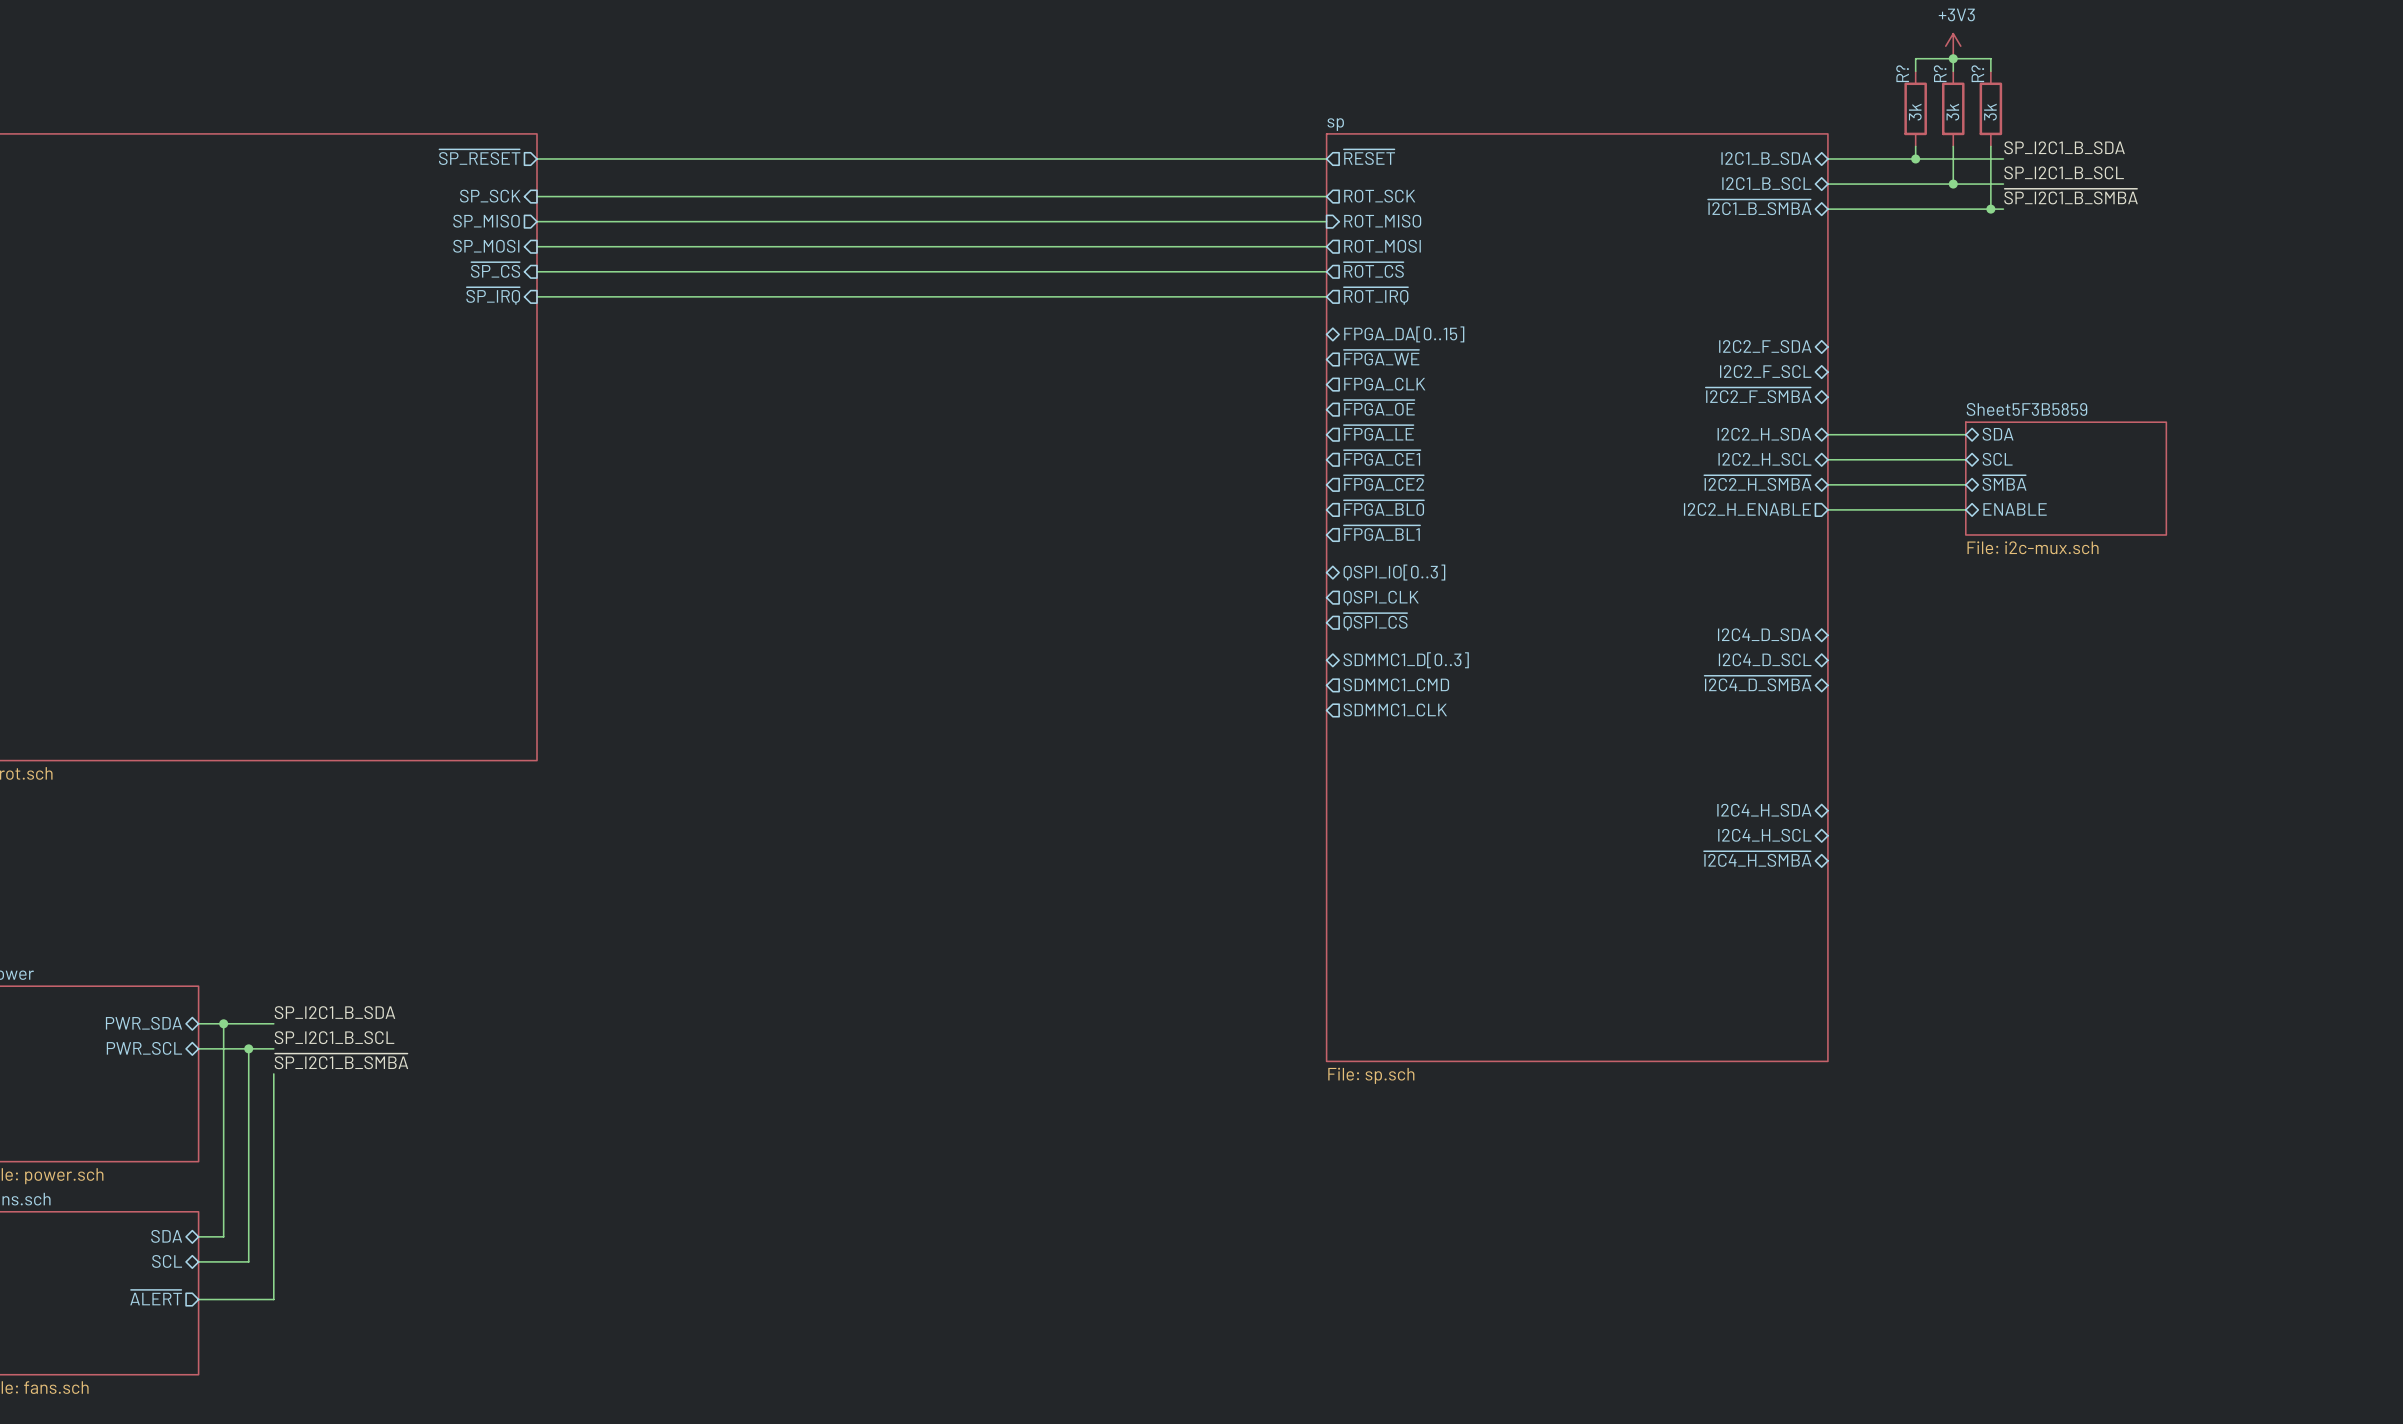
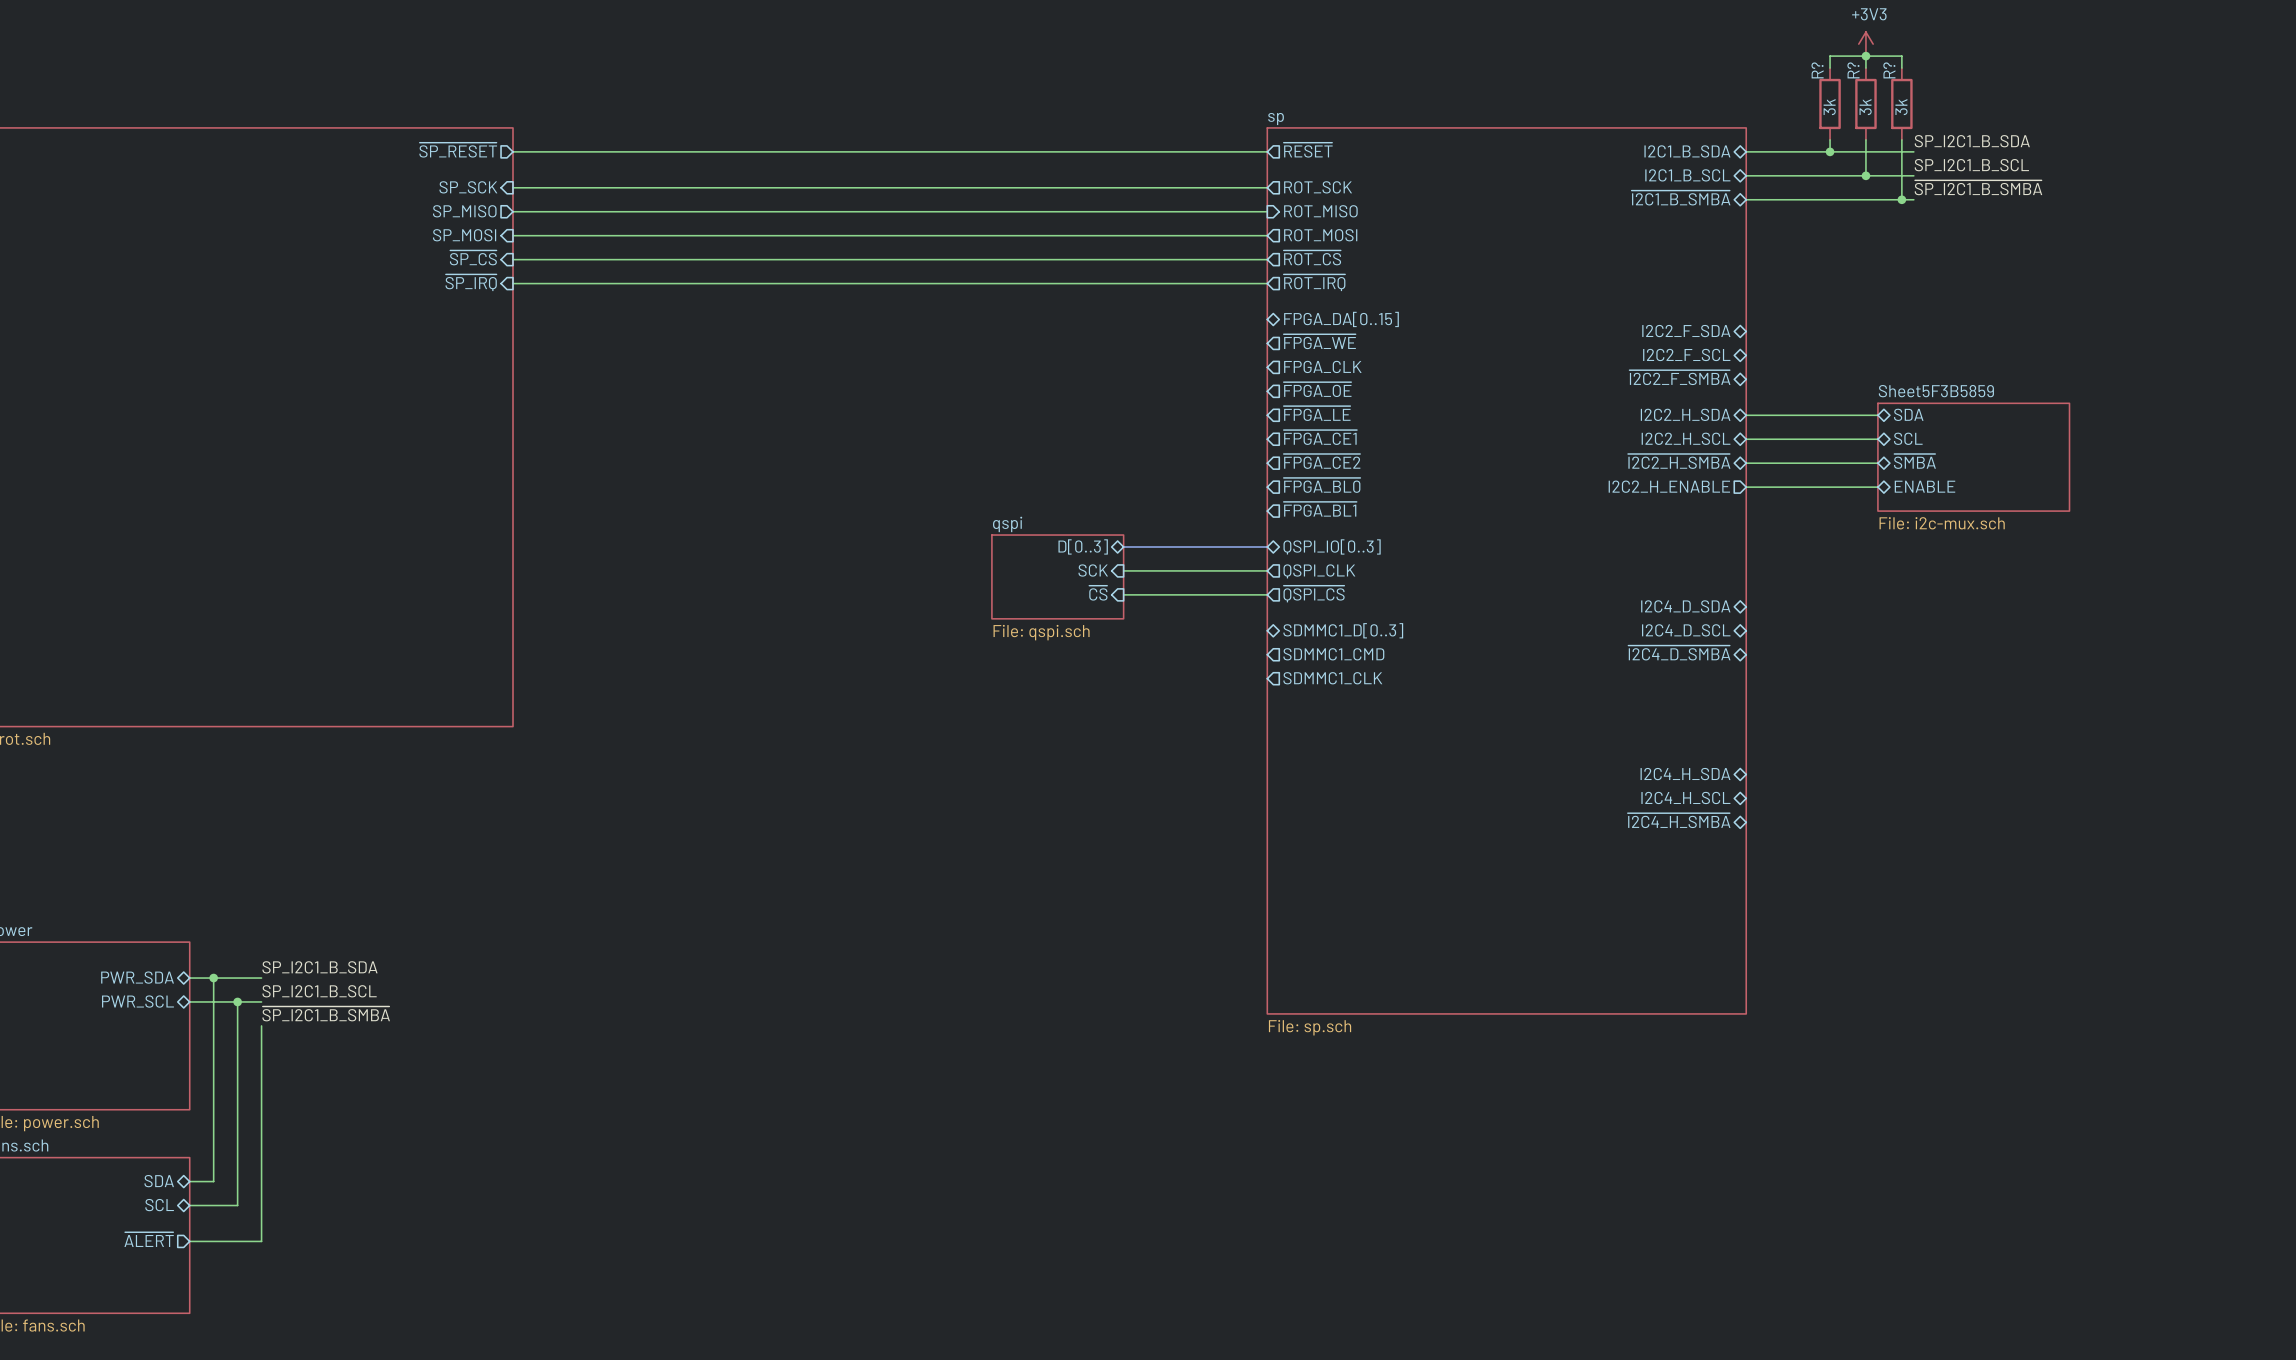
sheet pin: none -> D[0..3] (1083, 546)
bus: none -> (1123, 546) (1267, 546)
sheet pin: none -> SCK (1093, 570)
wire: none -> (1123, 570) (1267, 570)
sheet qspi: none -> File: qspi.sch (1057, 576)
sheet pin: none -> ~{CS} (1098, 593)
wire: none -> (1123, 594) (1267, 594)

